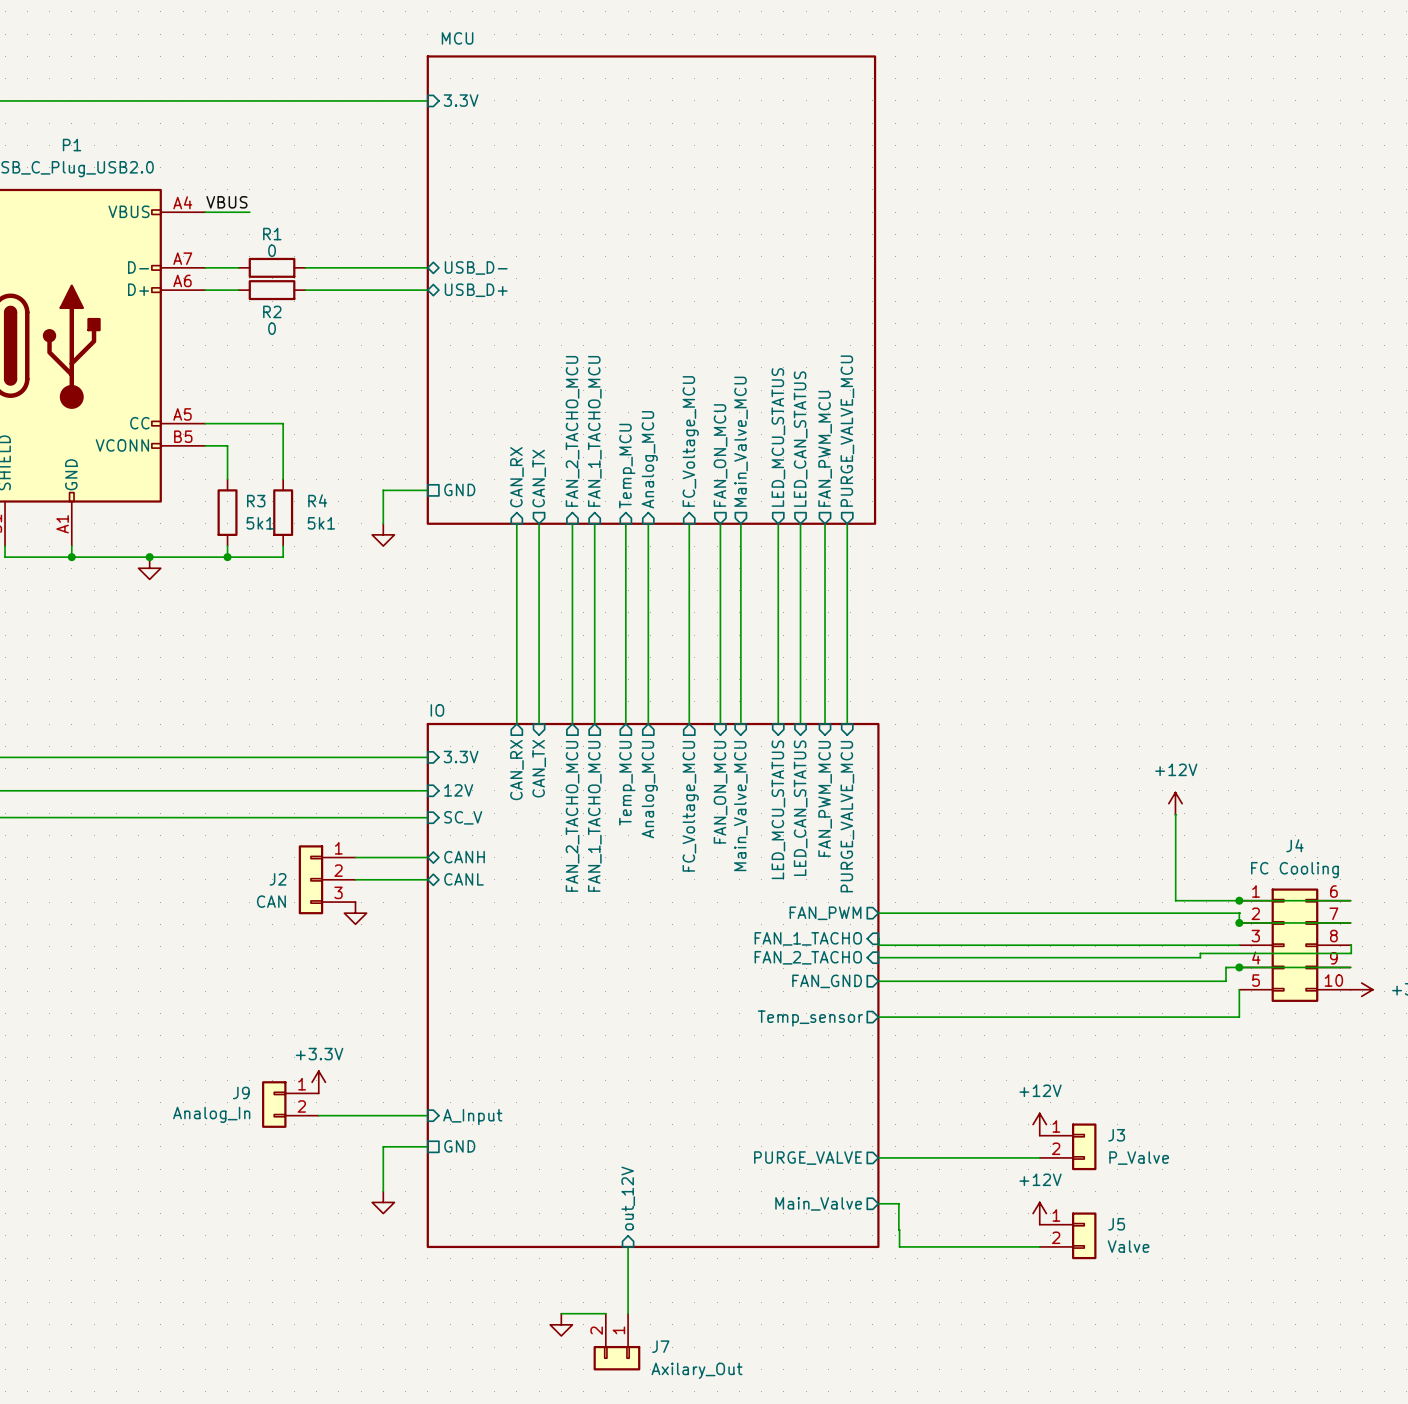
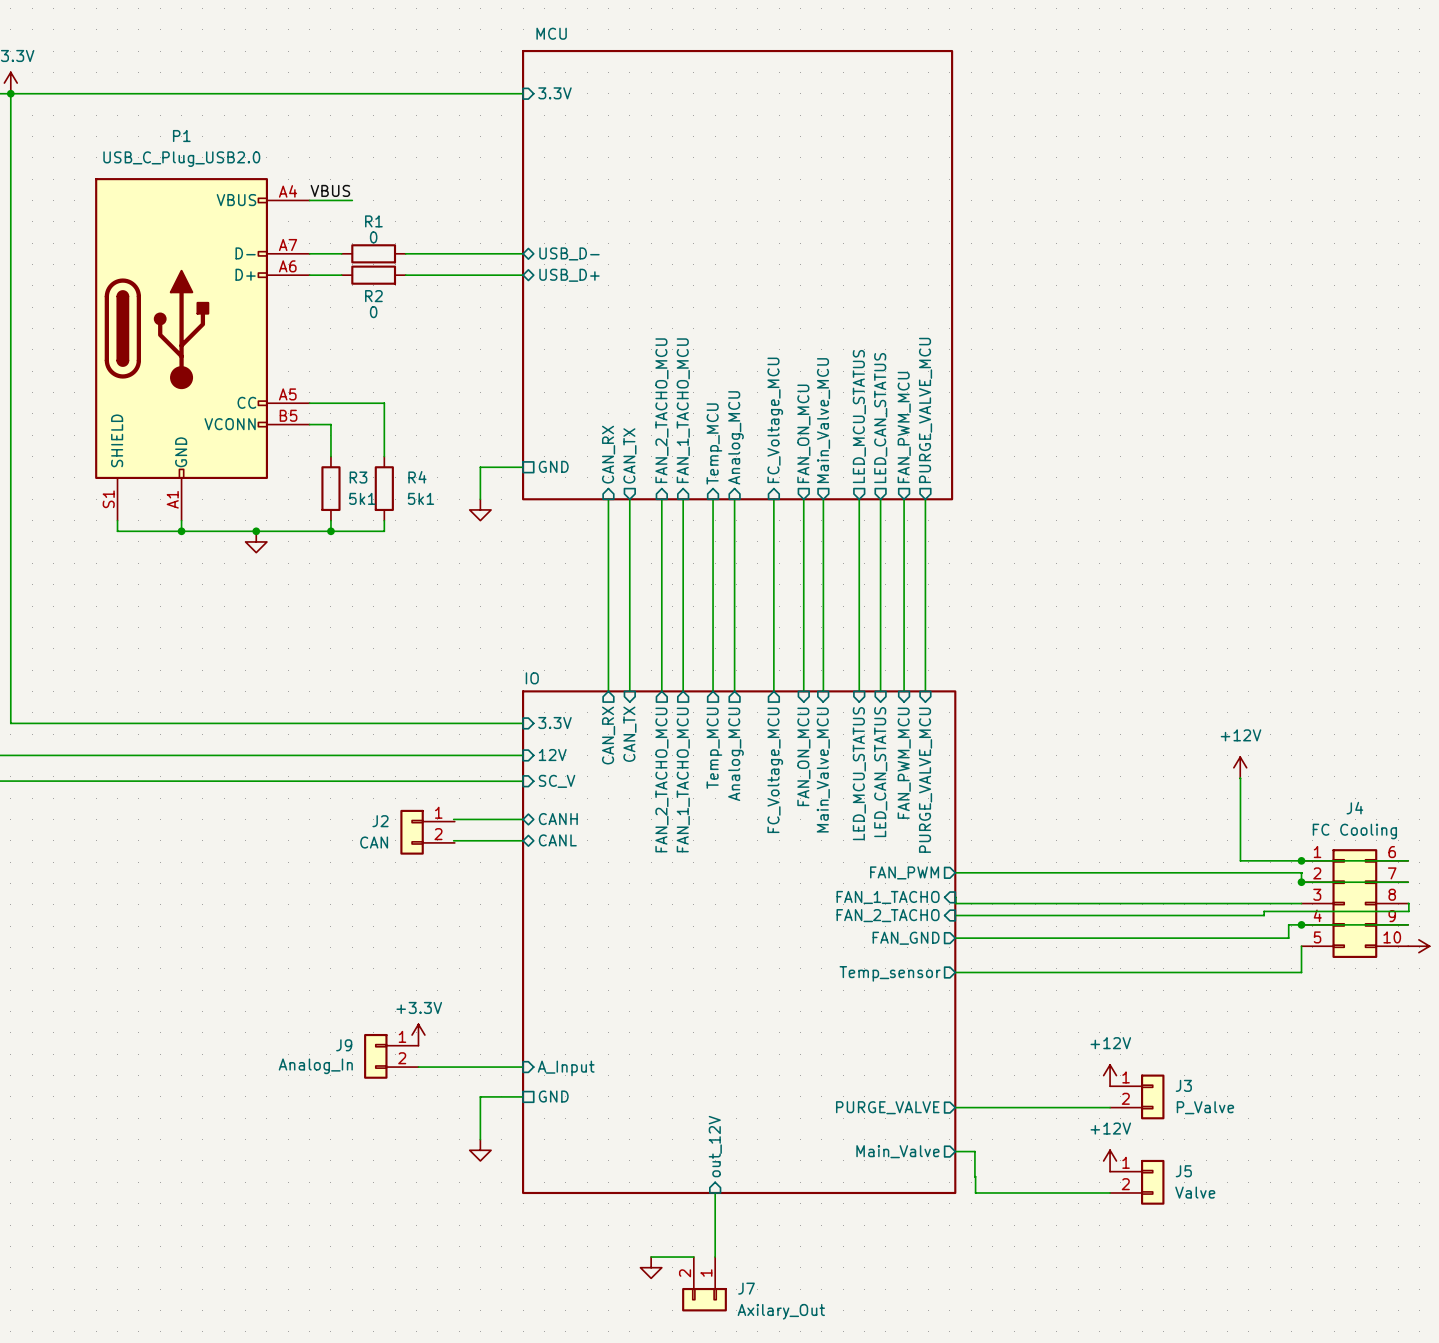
J2 symbol: [298, 845, 356, 915] -> [400, 809, 455, 855]
power symbol: (355, 913) -> none

